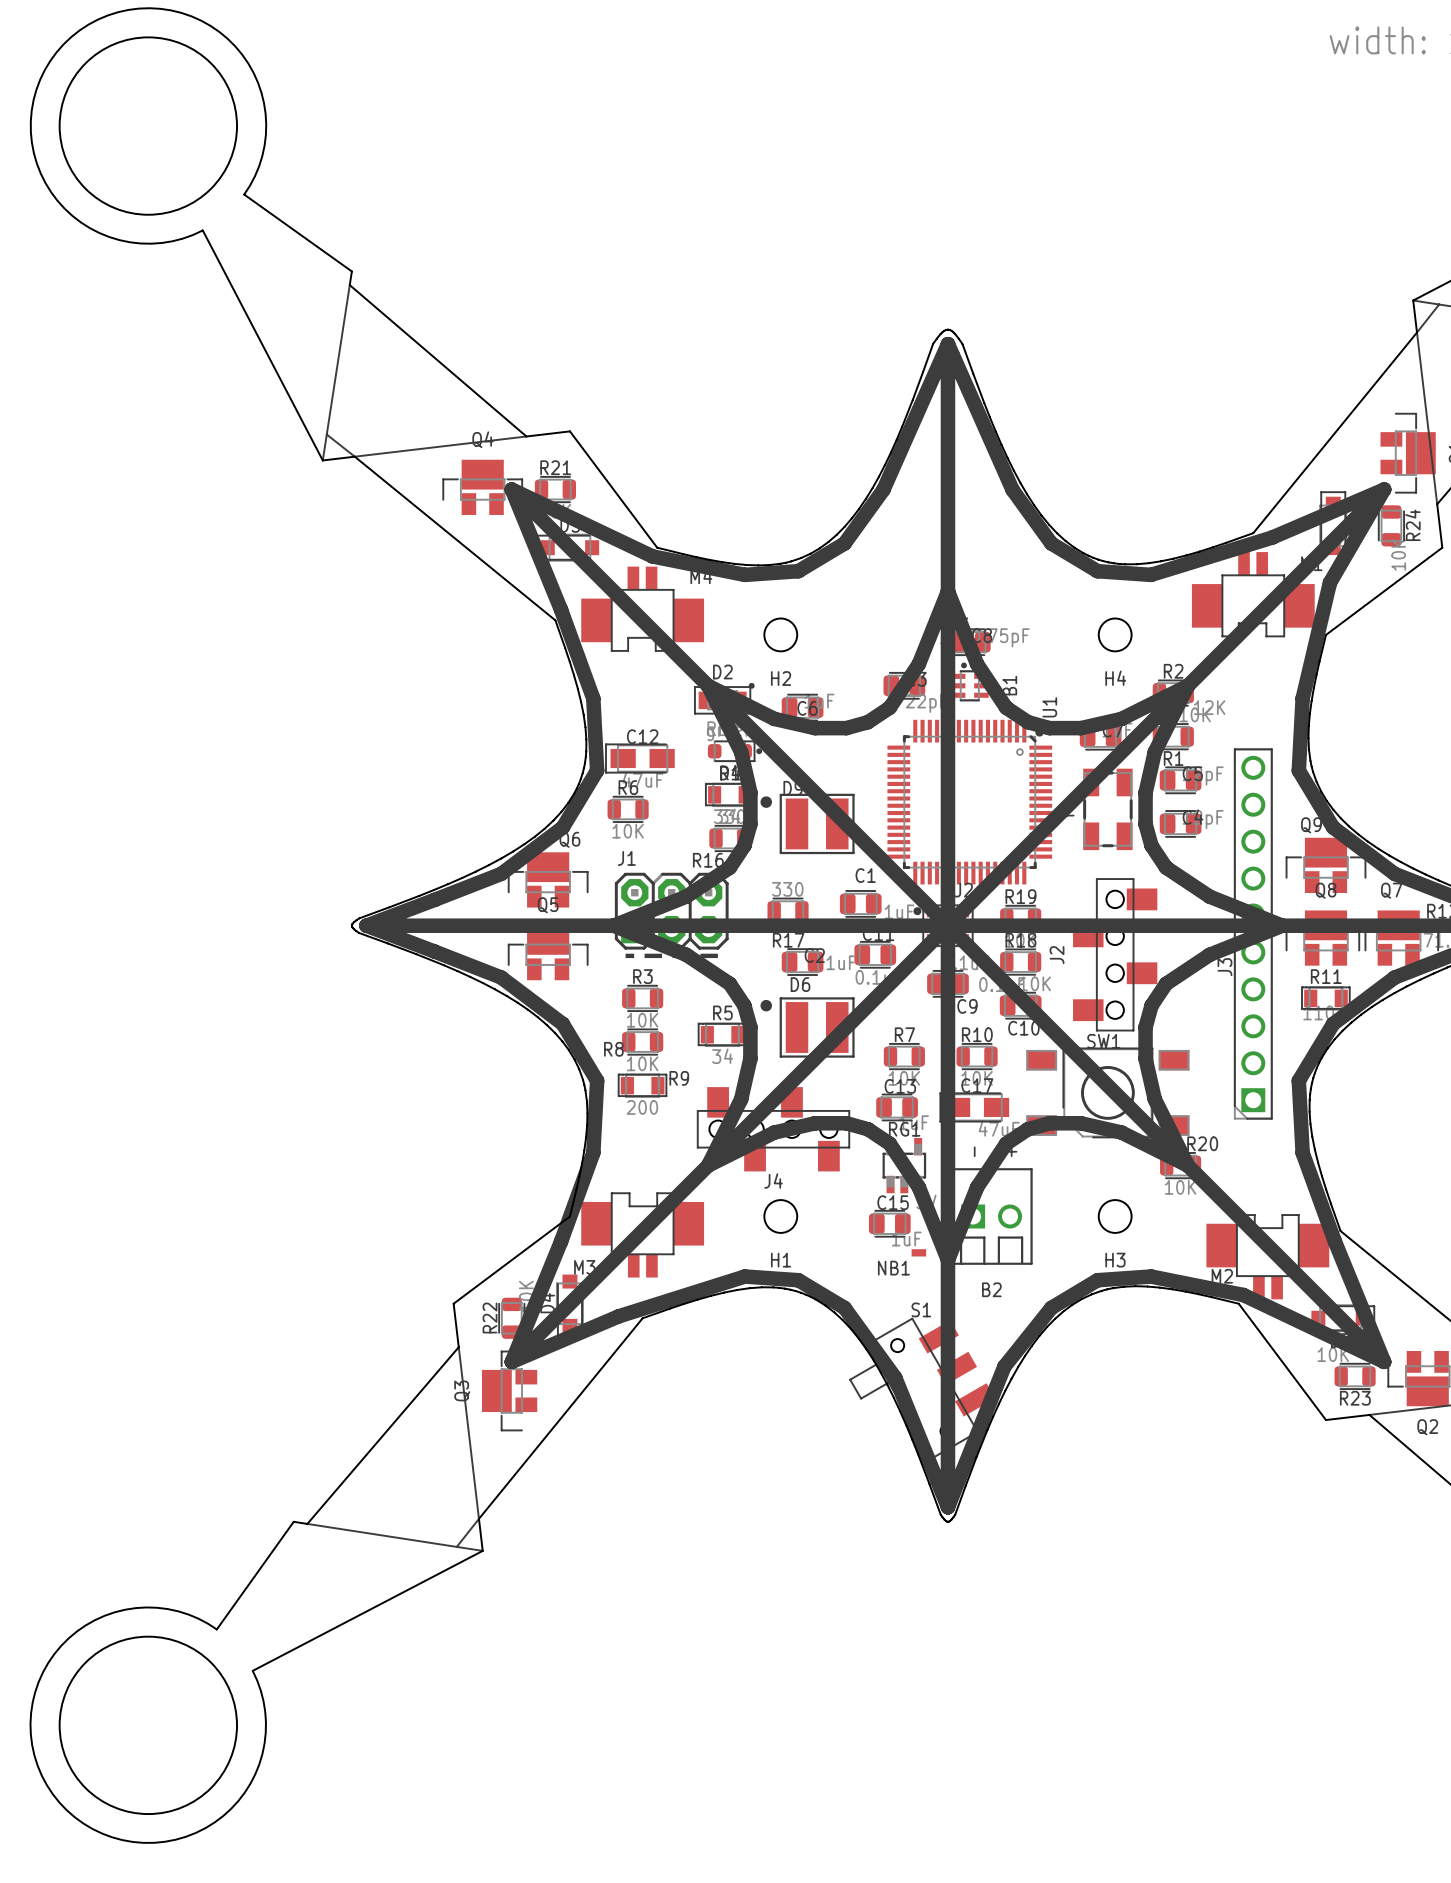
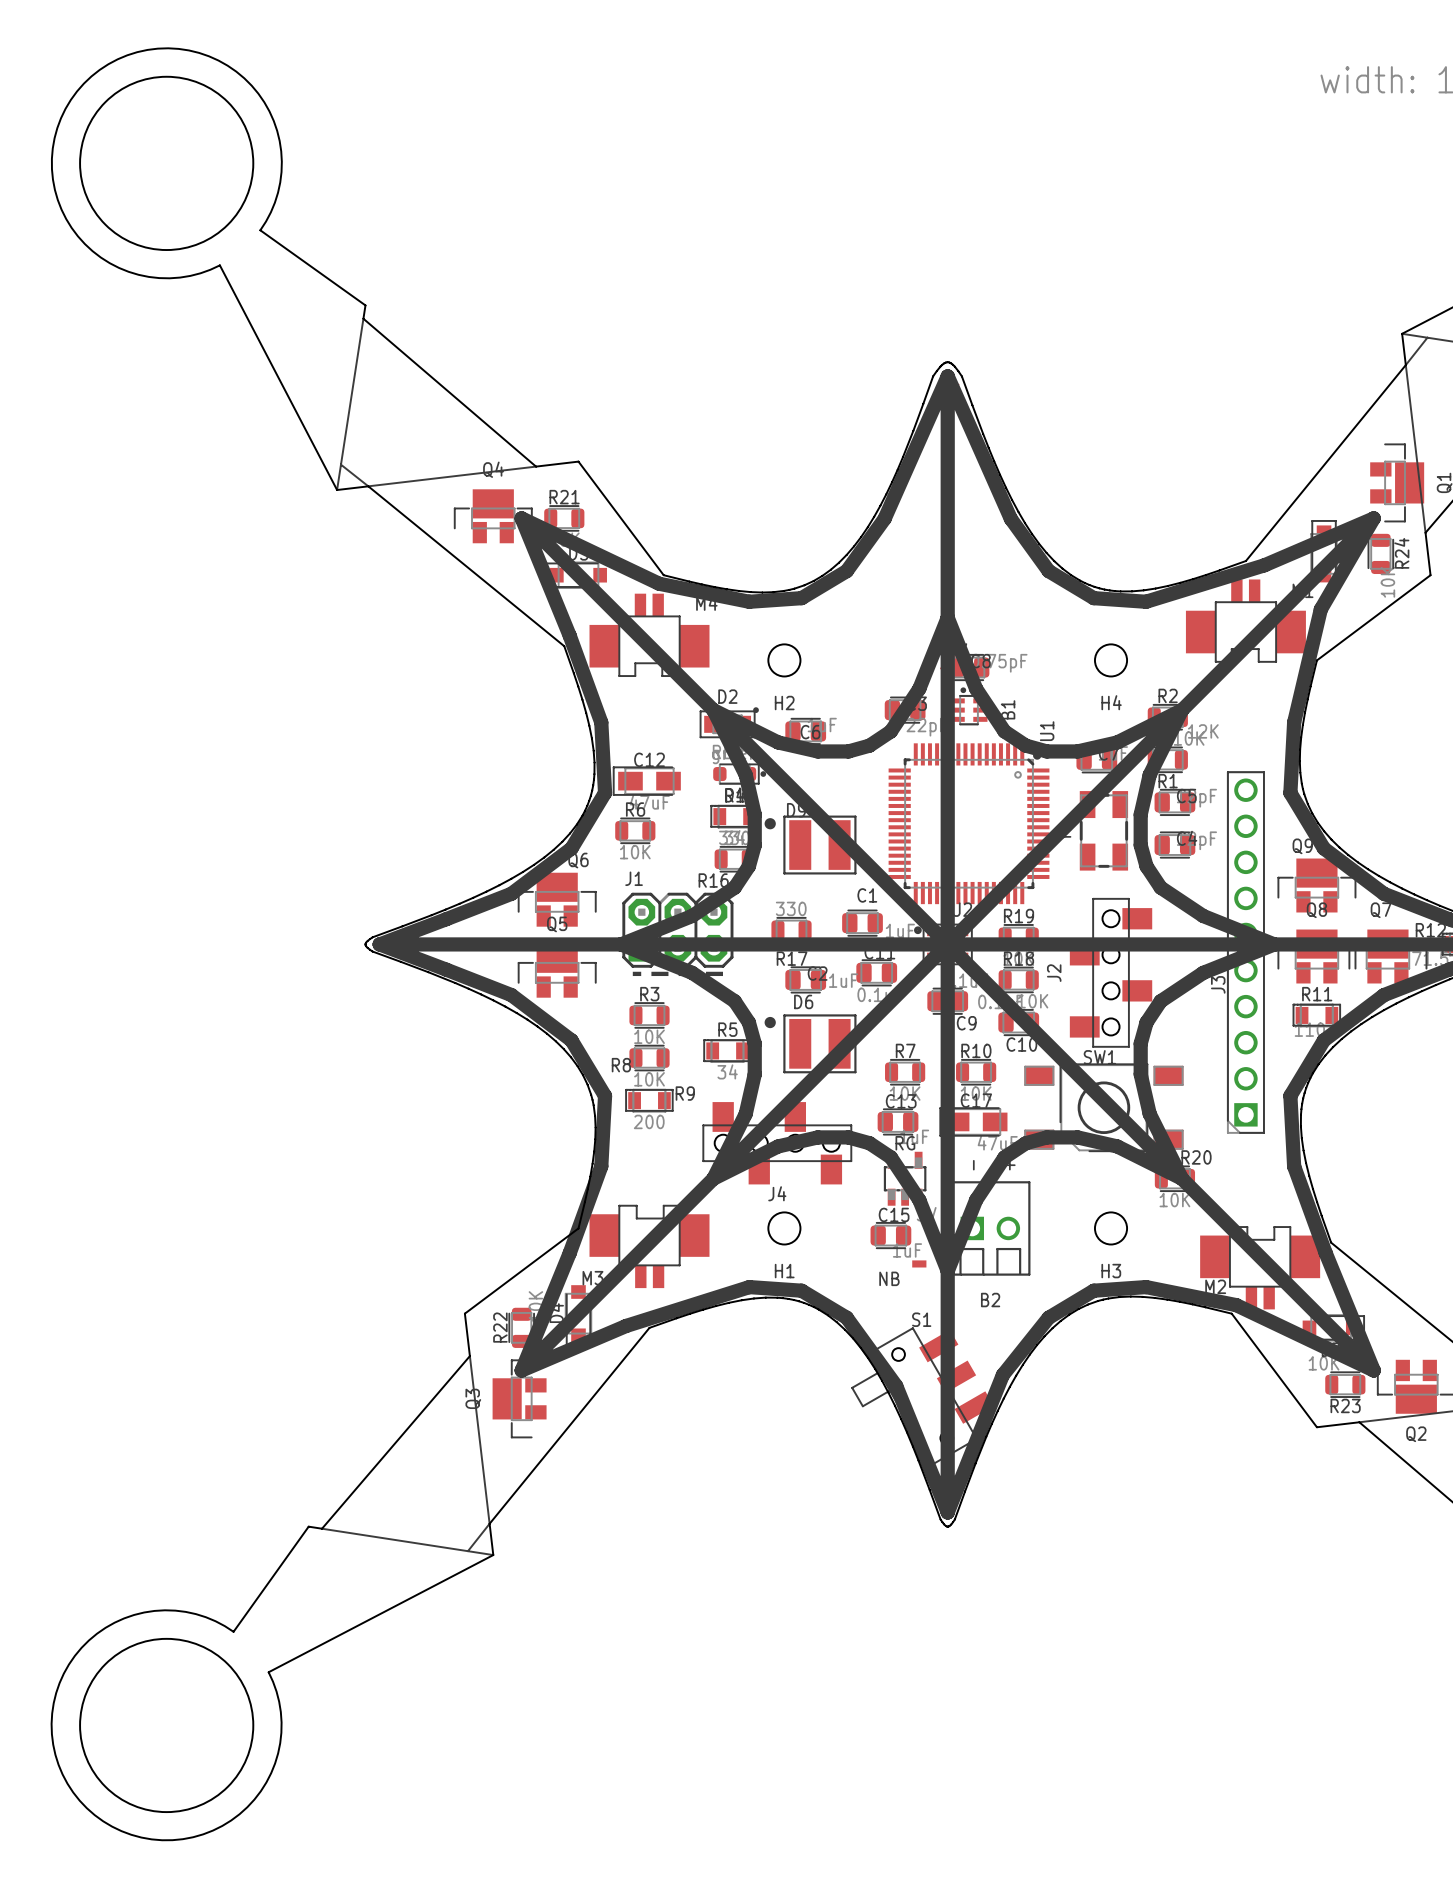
RG1 name: RG1 (904, 1129) -> RG (905, 1143)
NB1 name: NB1 (893, 1268) -> NB (889, 1278)

